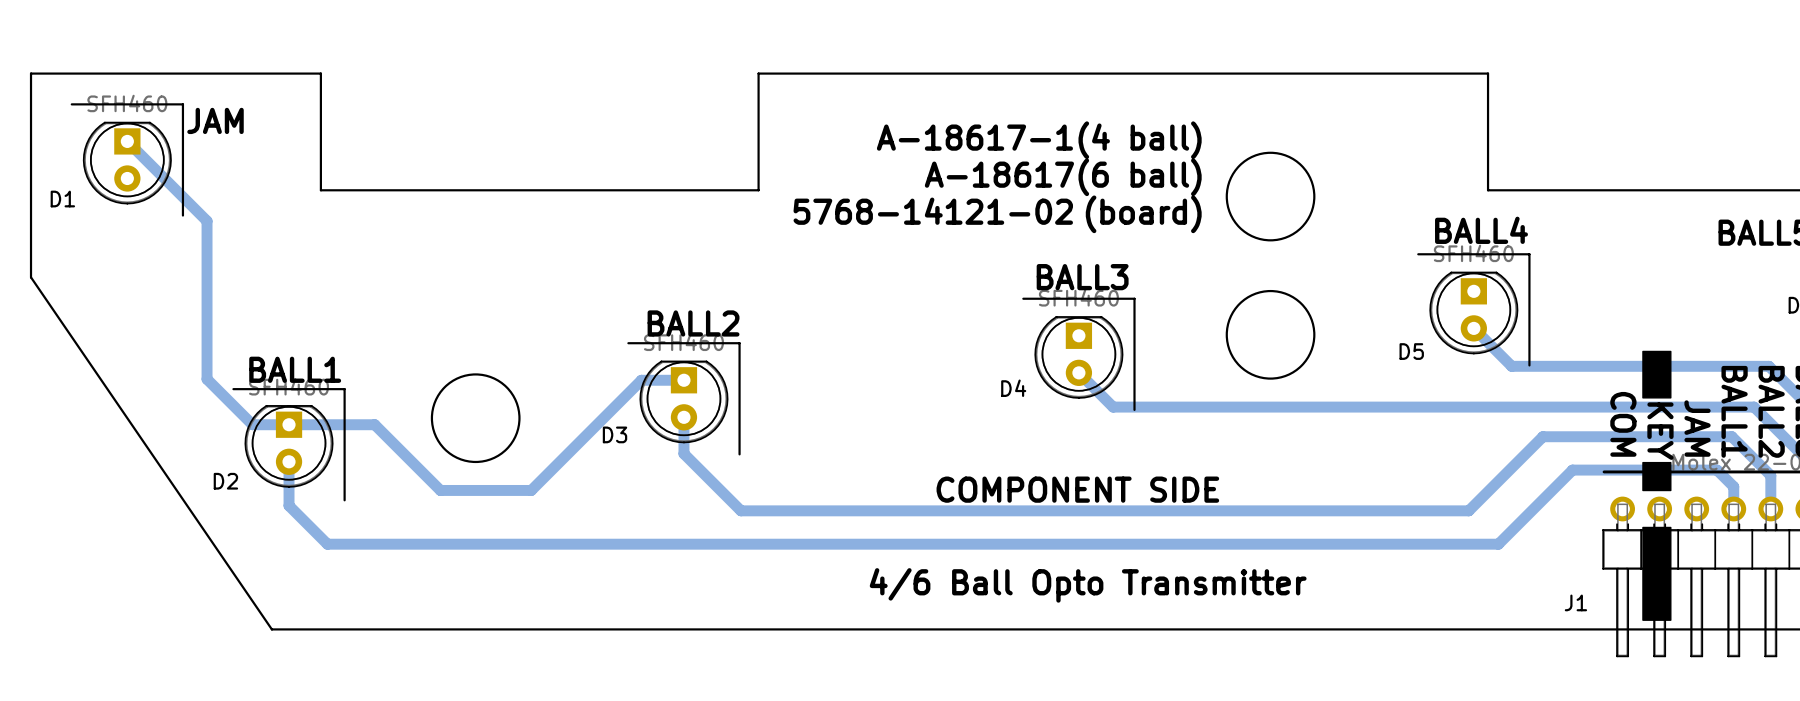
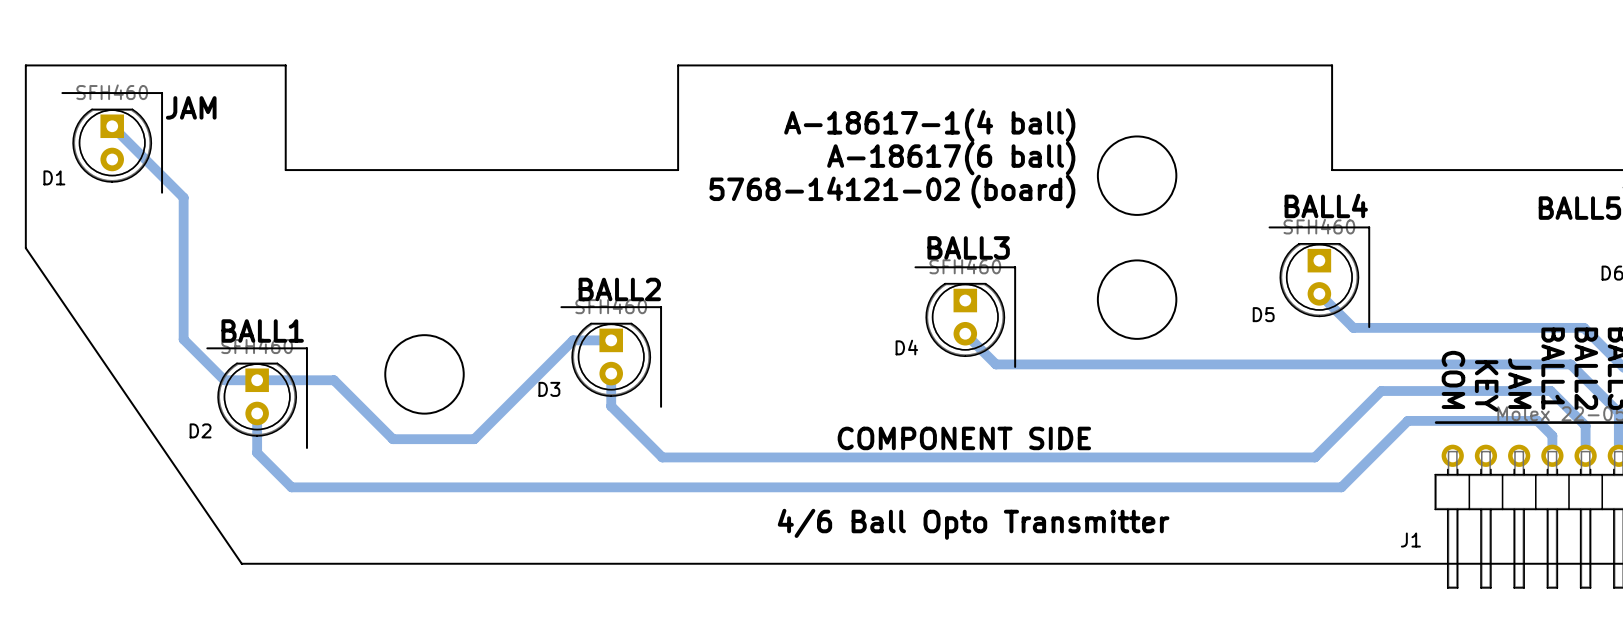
drawing: [1642, 350, 1672, 399] -> none
drawing: [1642, 461, 1672, 492] -> none
drawing: [1642, 526, 1672, 621] -> none

